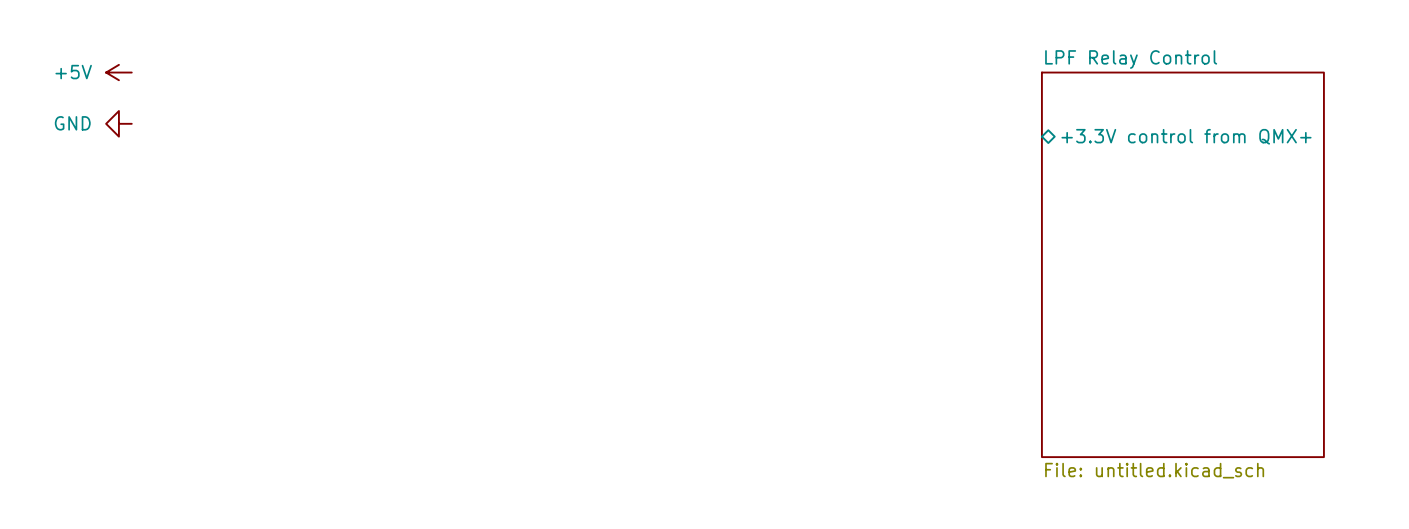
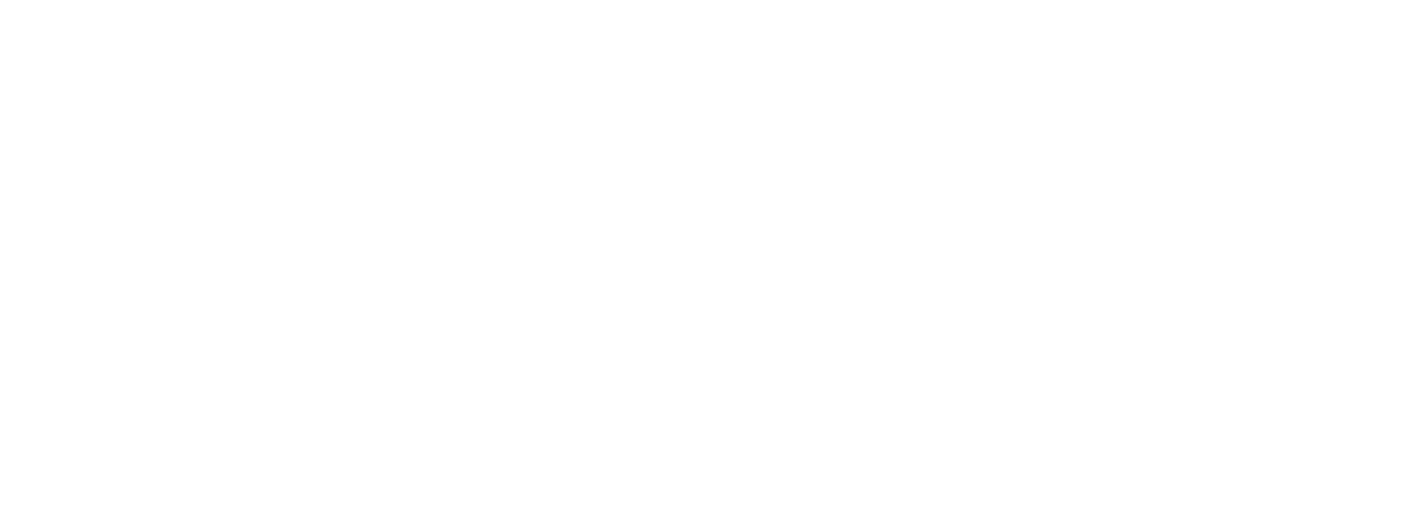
power symbol: +5V (118, 72) -> none
power symbol: GND (118, 123) -> none
sheet pin: +3.3V control from QMX+ (1186, 136) -> none
sheet LPF Relay Control: File: untitled.kicad_sch (1182, 264) -> none

